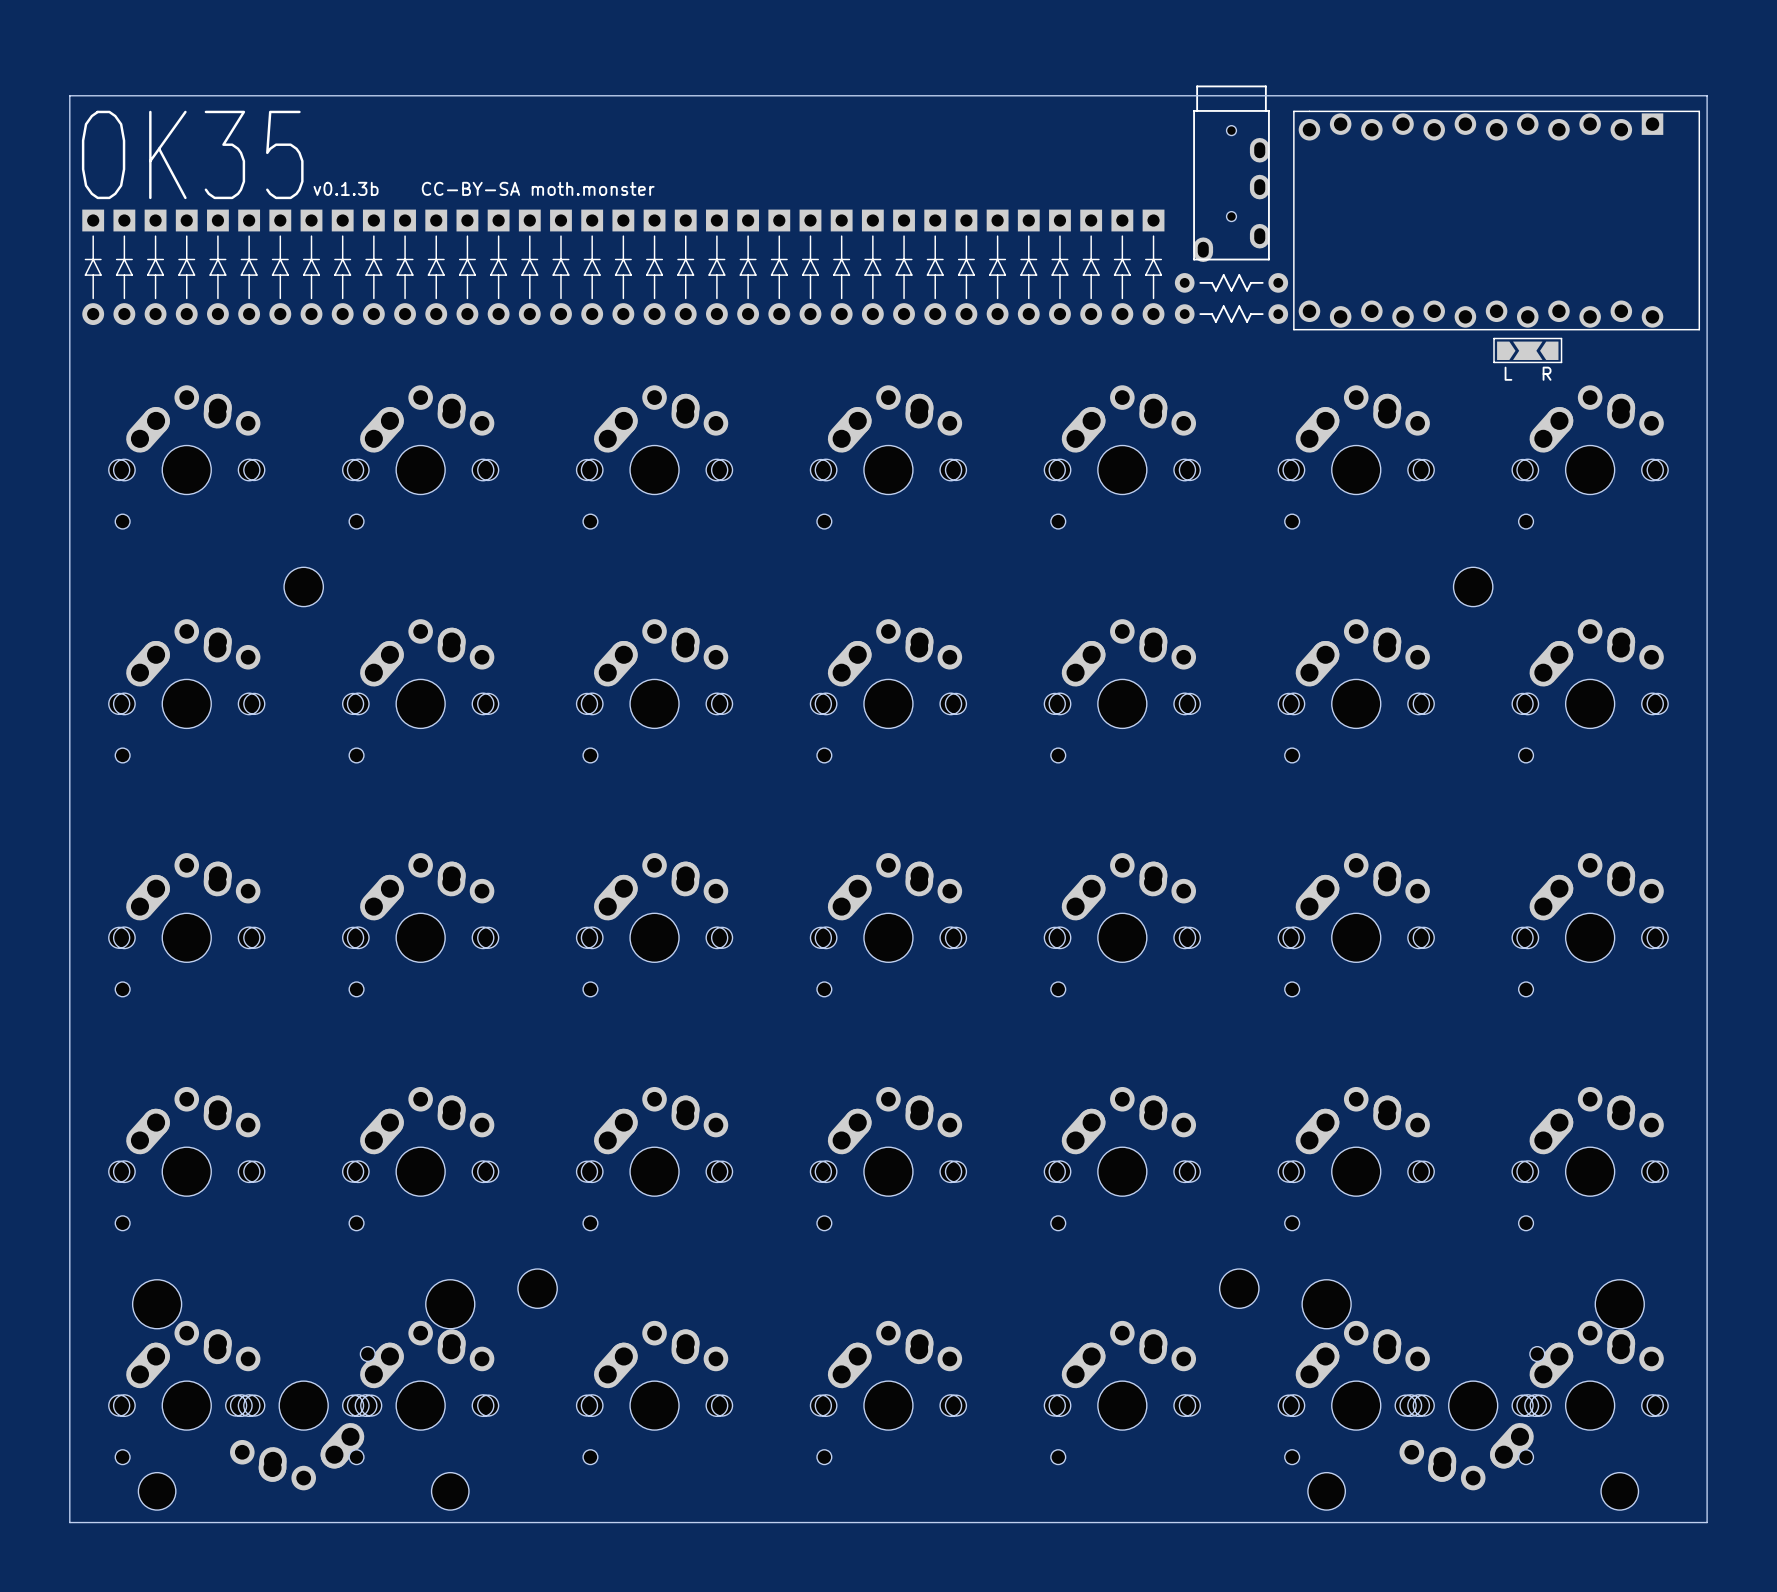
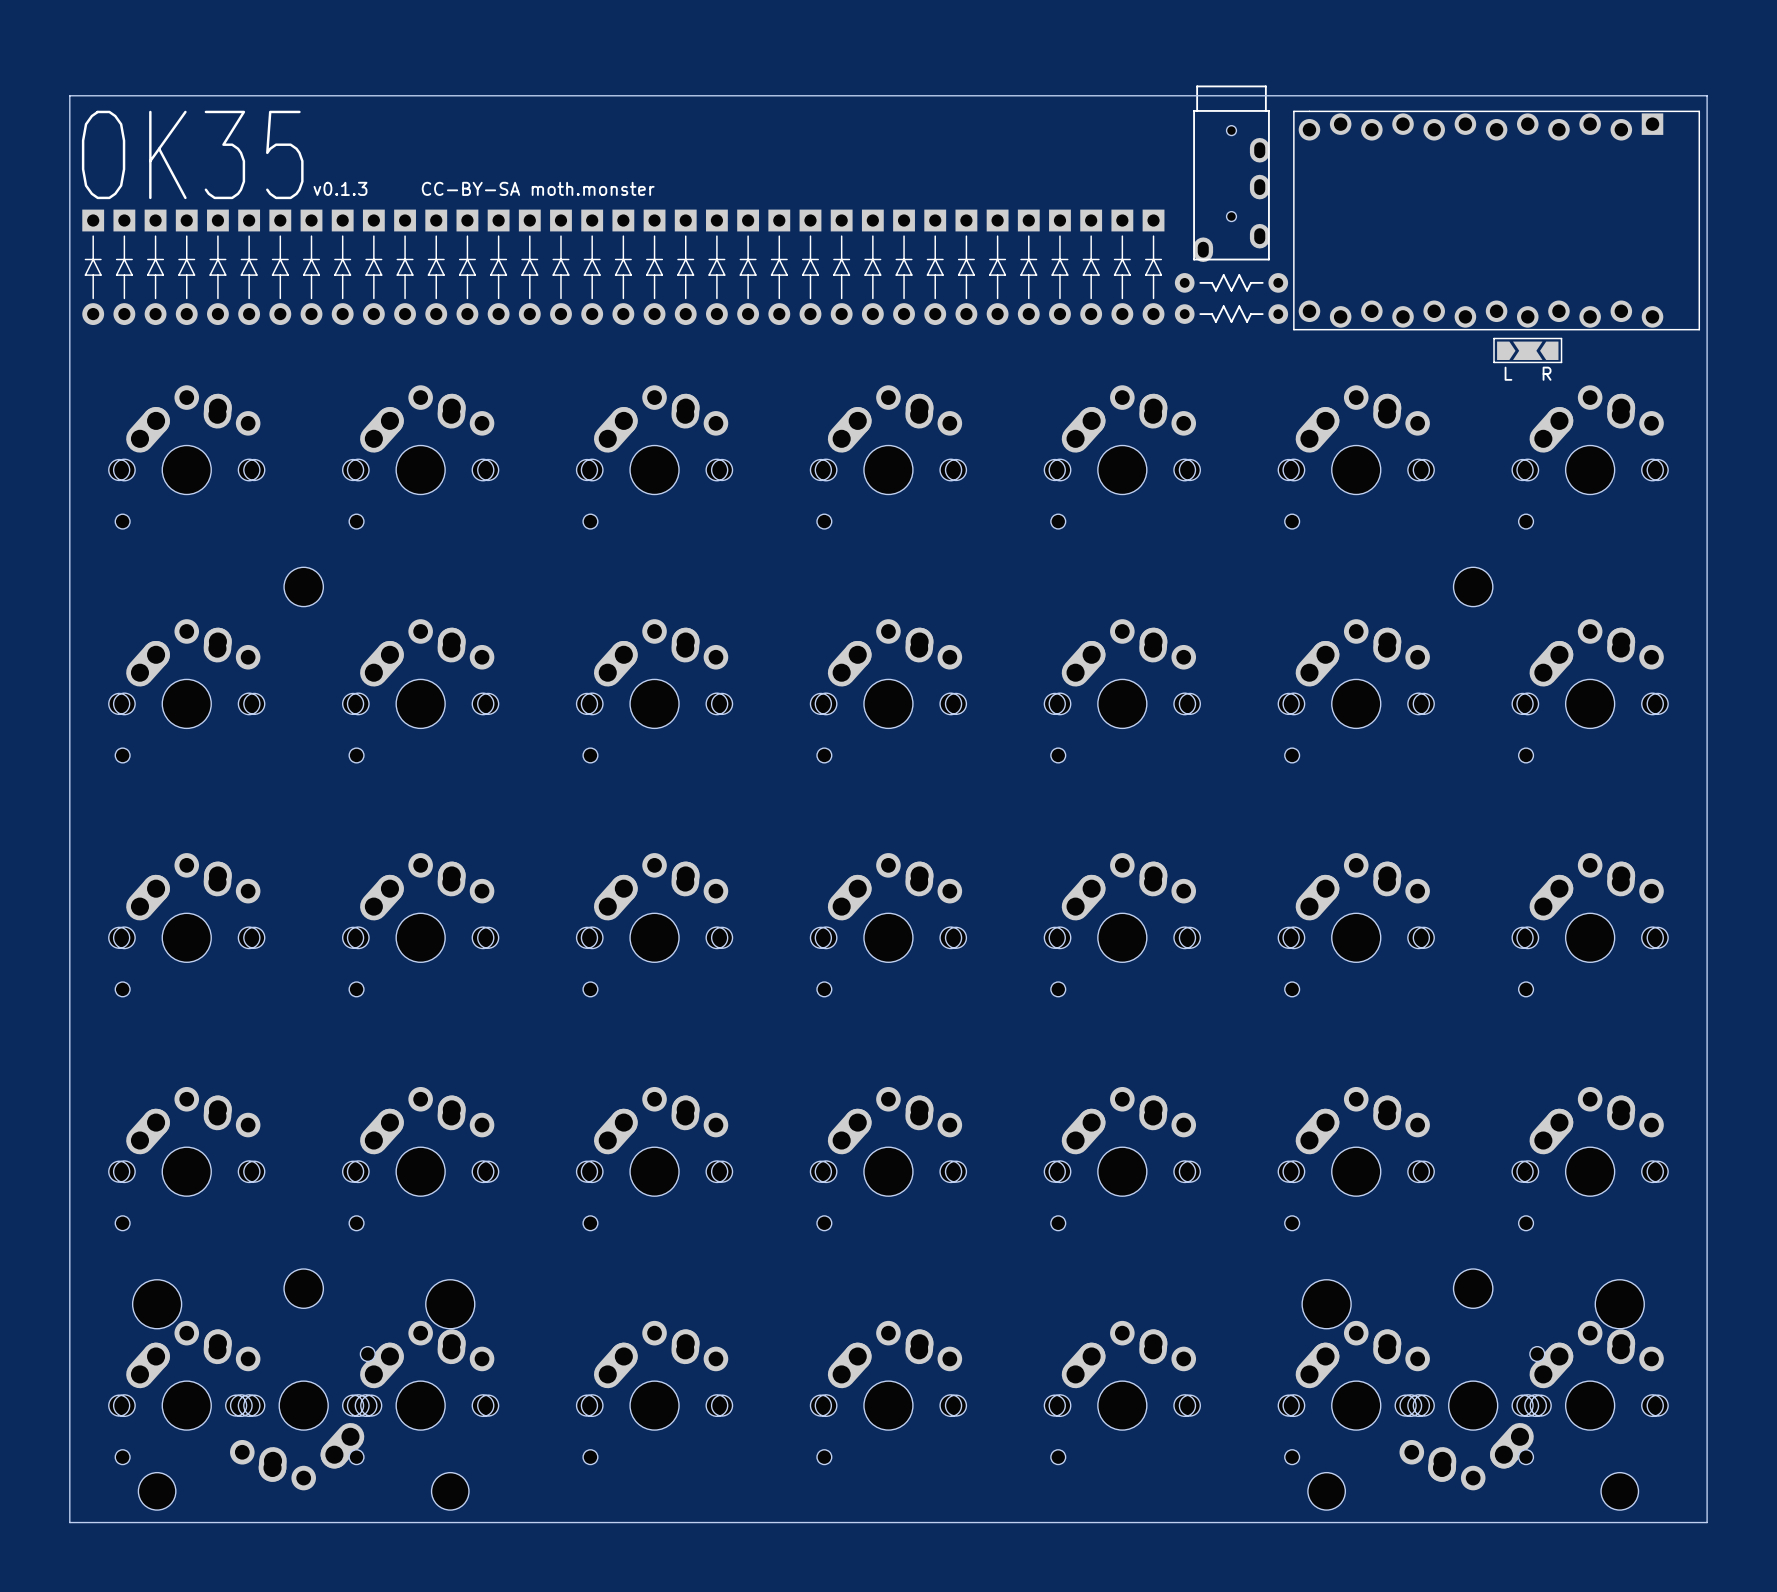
text: v0.1.3b (346, 188) -> v0.1.3 (340, 188)
part position: (537, 1288) -> (303, 1288)
part position: (1239, 1288) -> (1473, 1288)

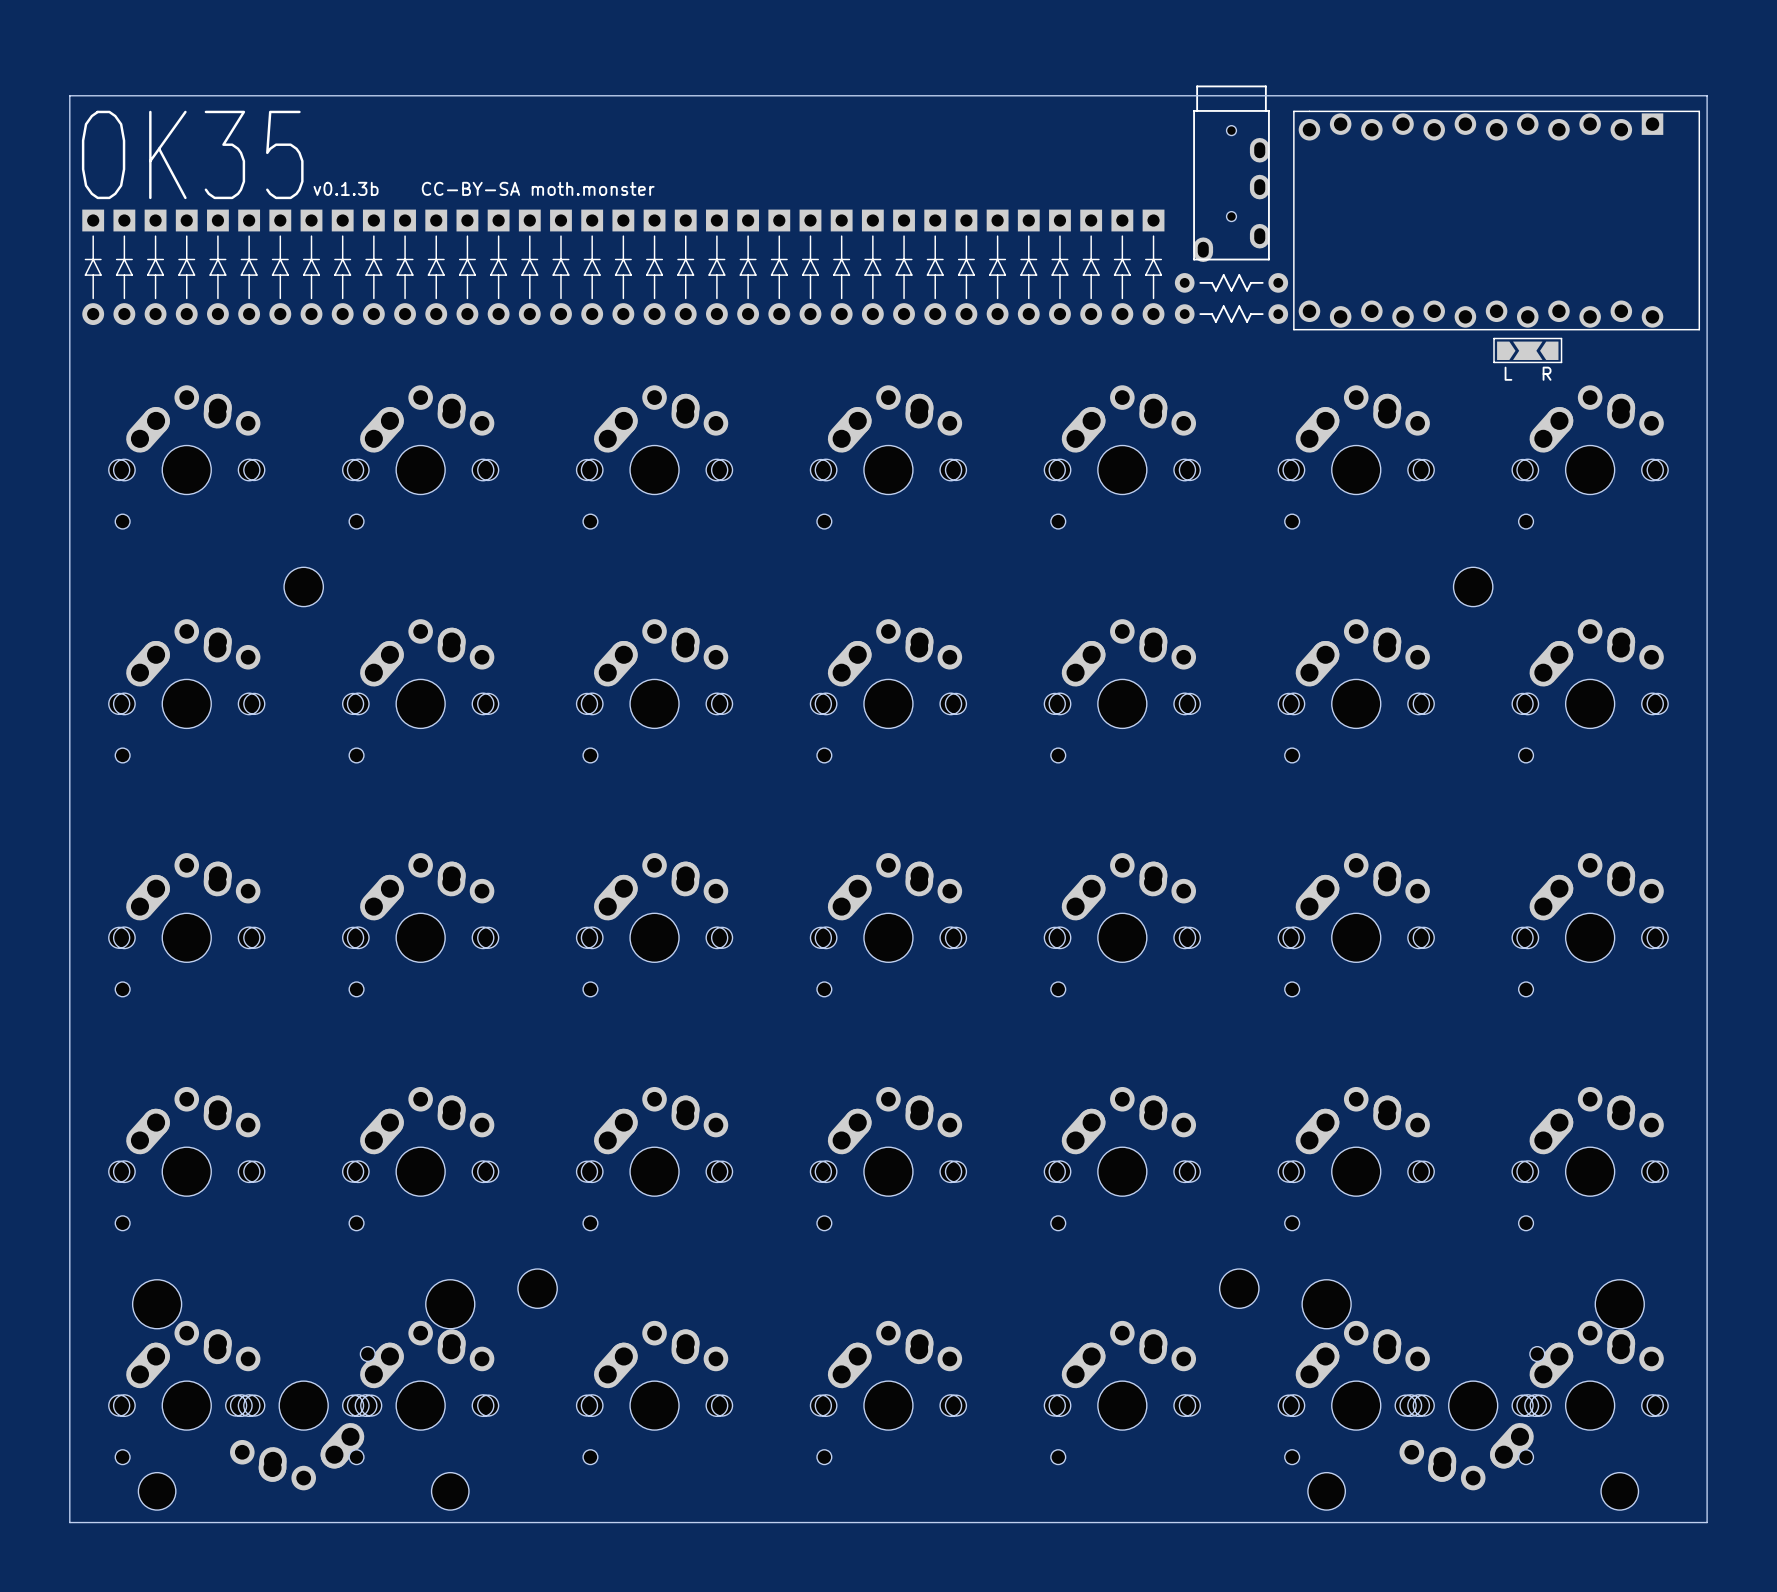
text: v0.1.3 (340, 188) -> v0.1.3b (346, 188)
part position: (303, 1288) -> (537, 1288)
part position: (1473, 1288) -> (1239, 1288)

